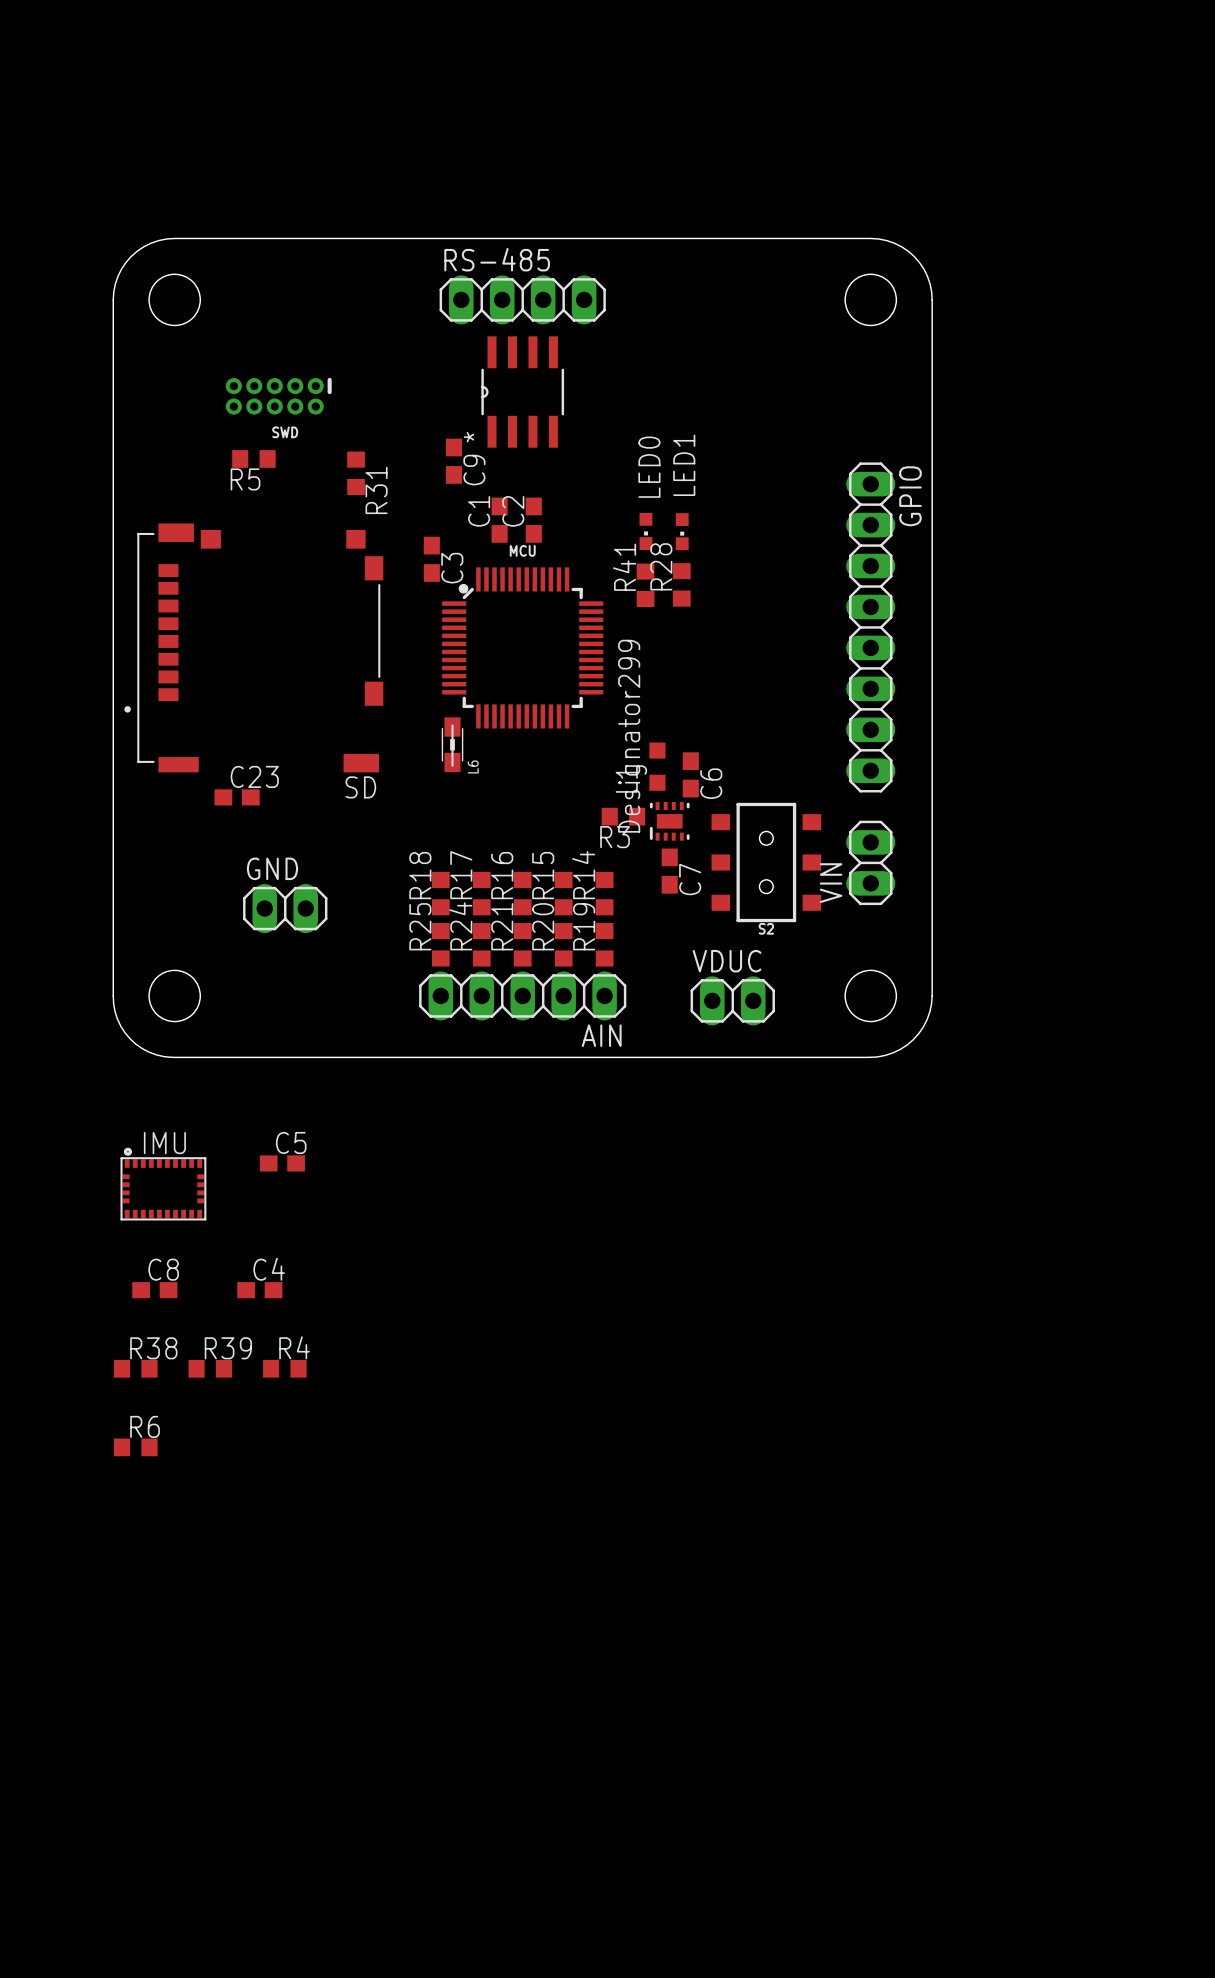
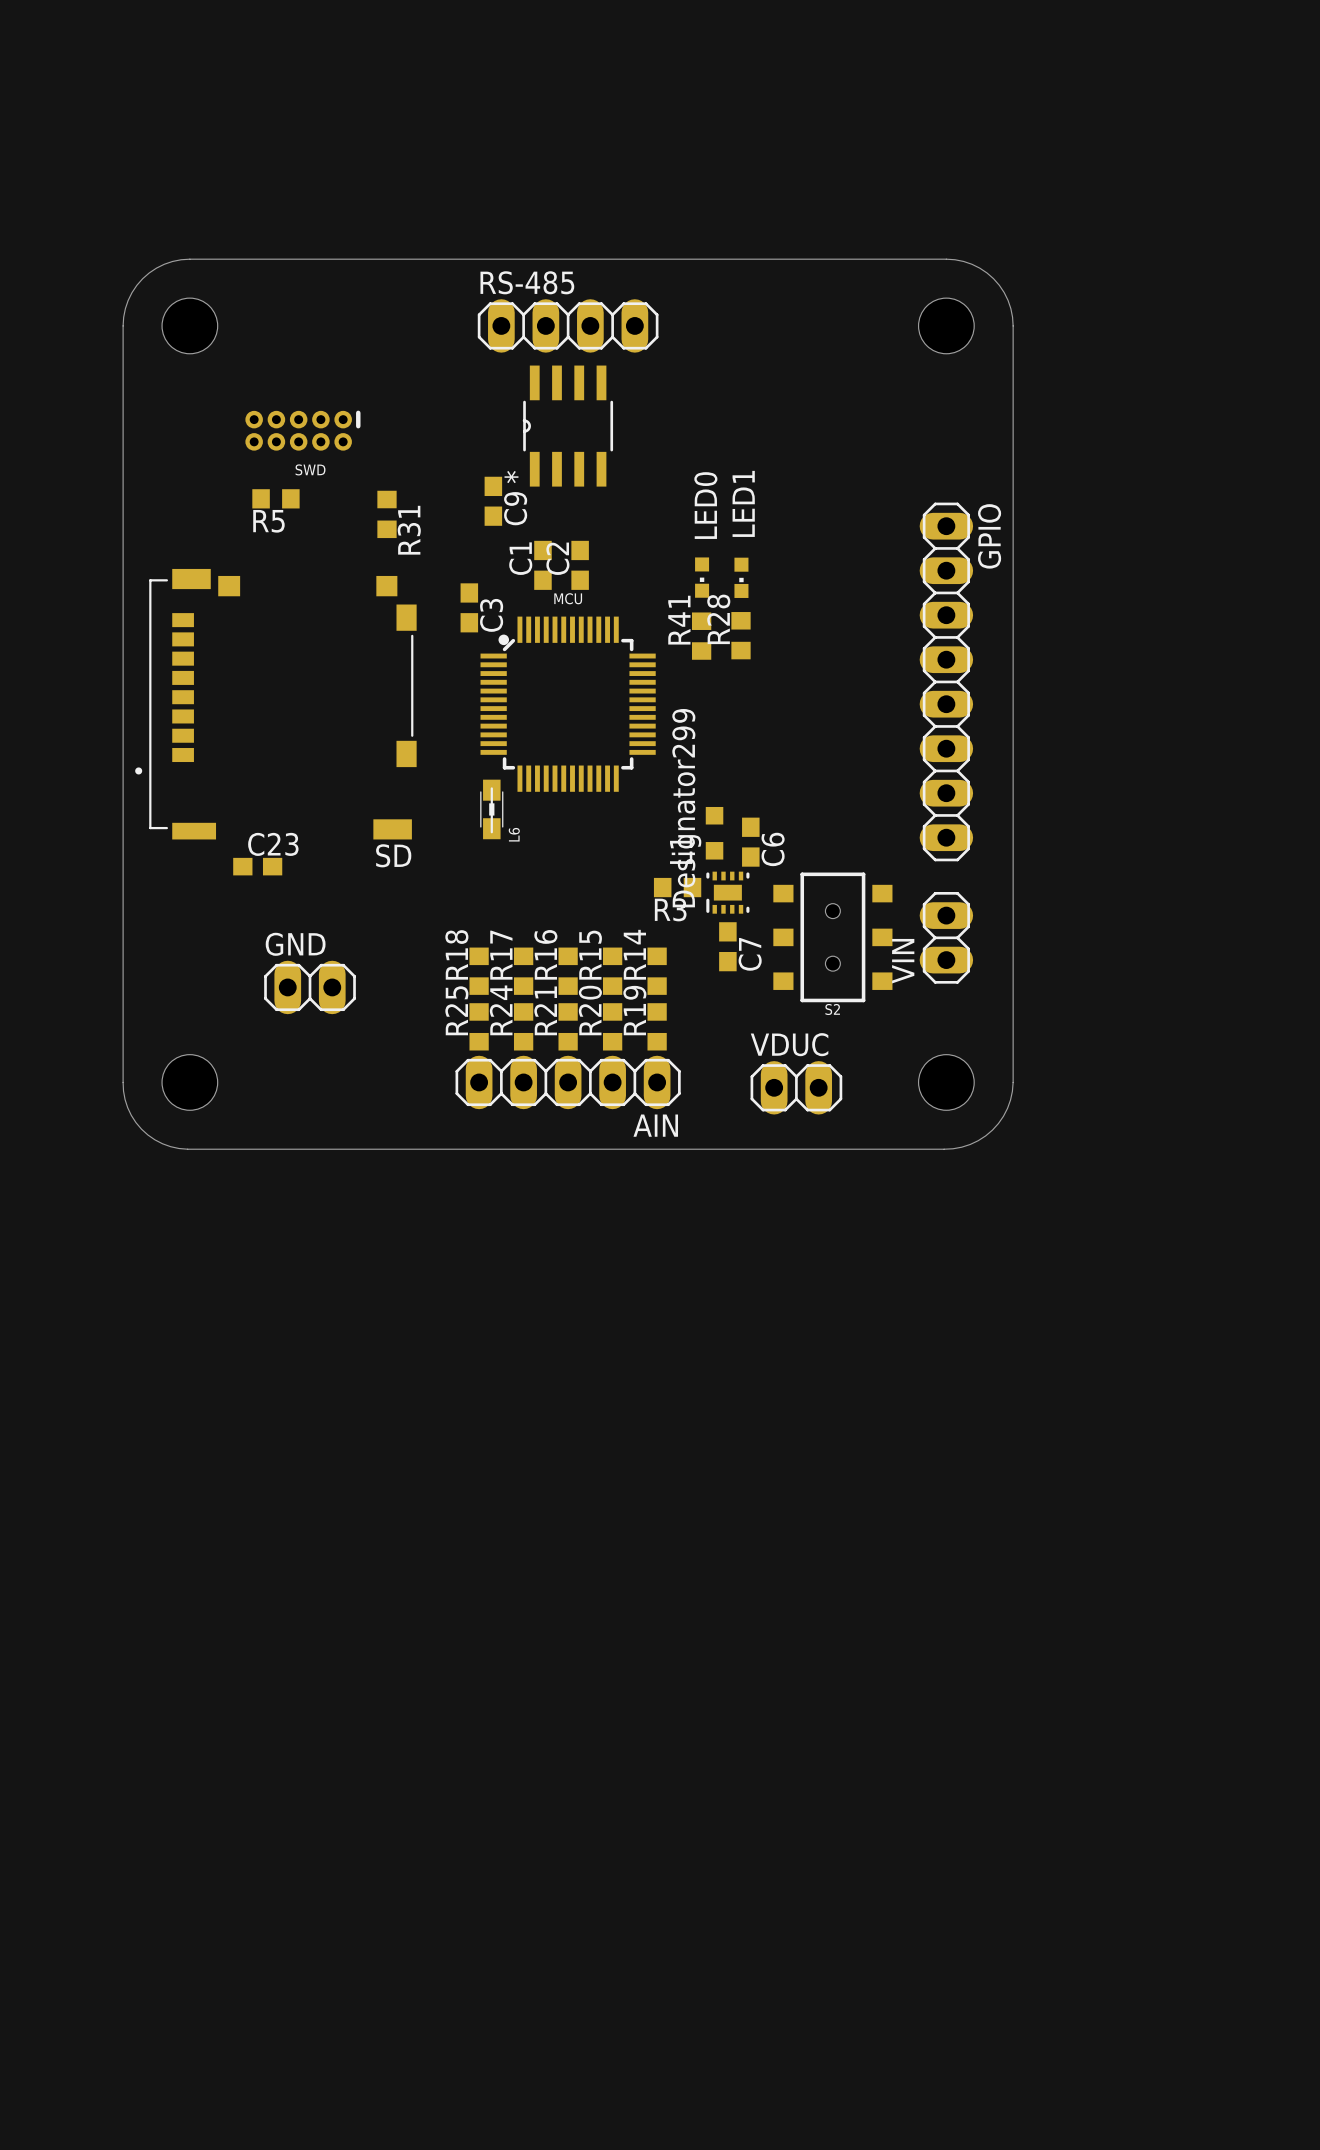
C5: (282, 1163) -> none
IMU: (163, 1184) -> none
C8: (154, 1290) -> none
C4: (259, 1290) -> none
R38: (135, 1368) -> none
R39: (210, 1368) -> none
R4: (284, 1368) -> none
R6: (135, 1447) -> none

